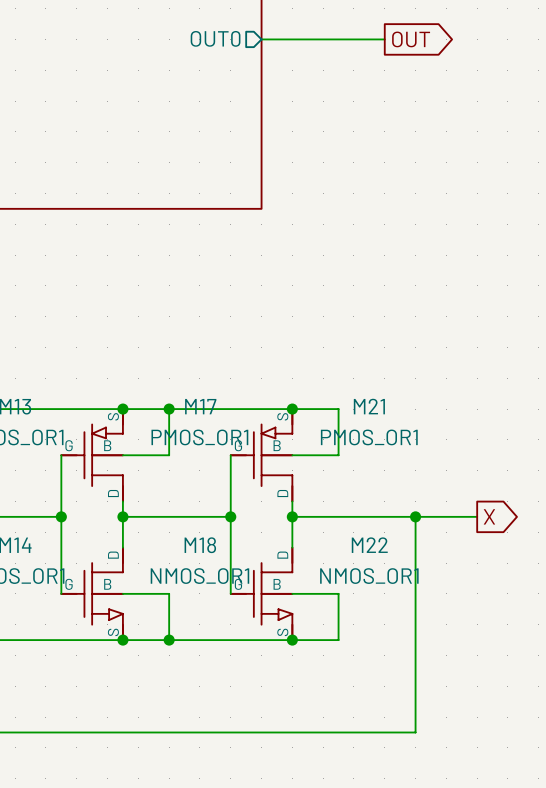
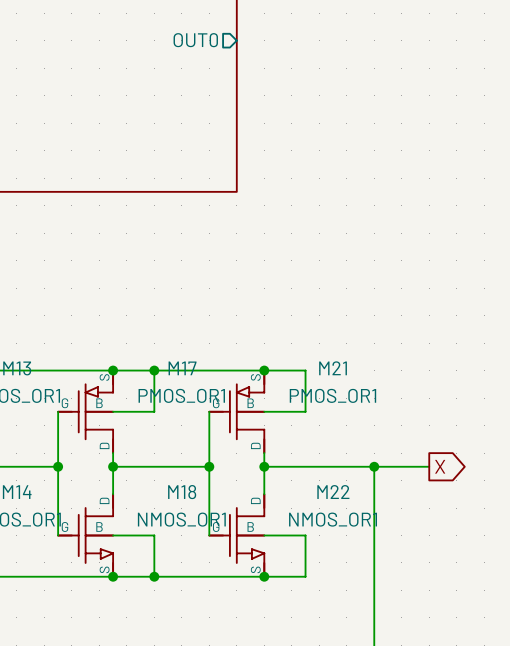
wire: (261, 39) (384, 39) -> none
global label: OUT (411, 39) -> none

